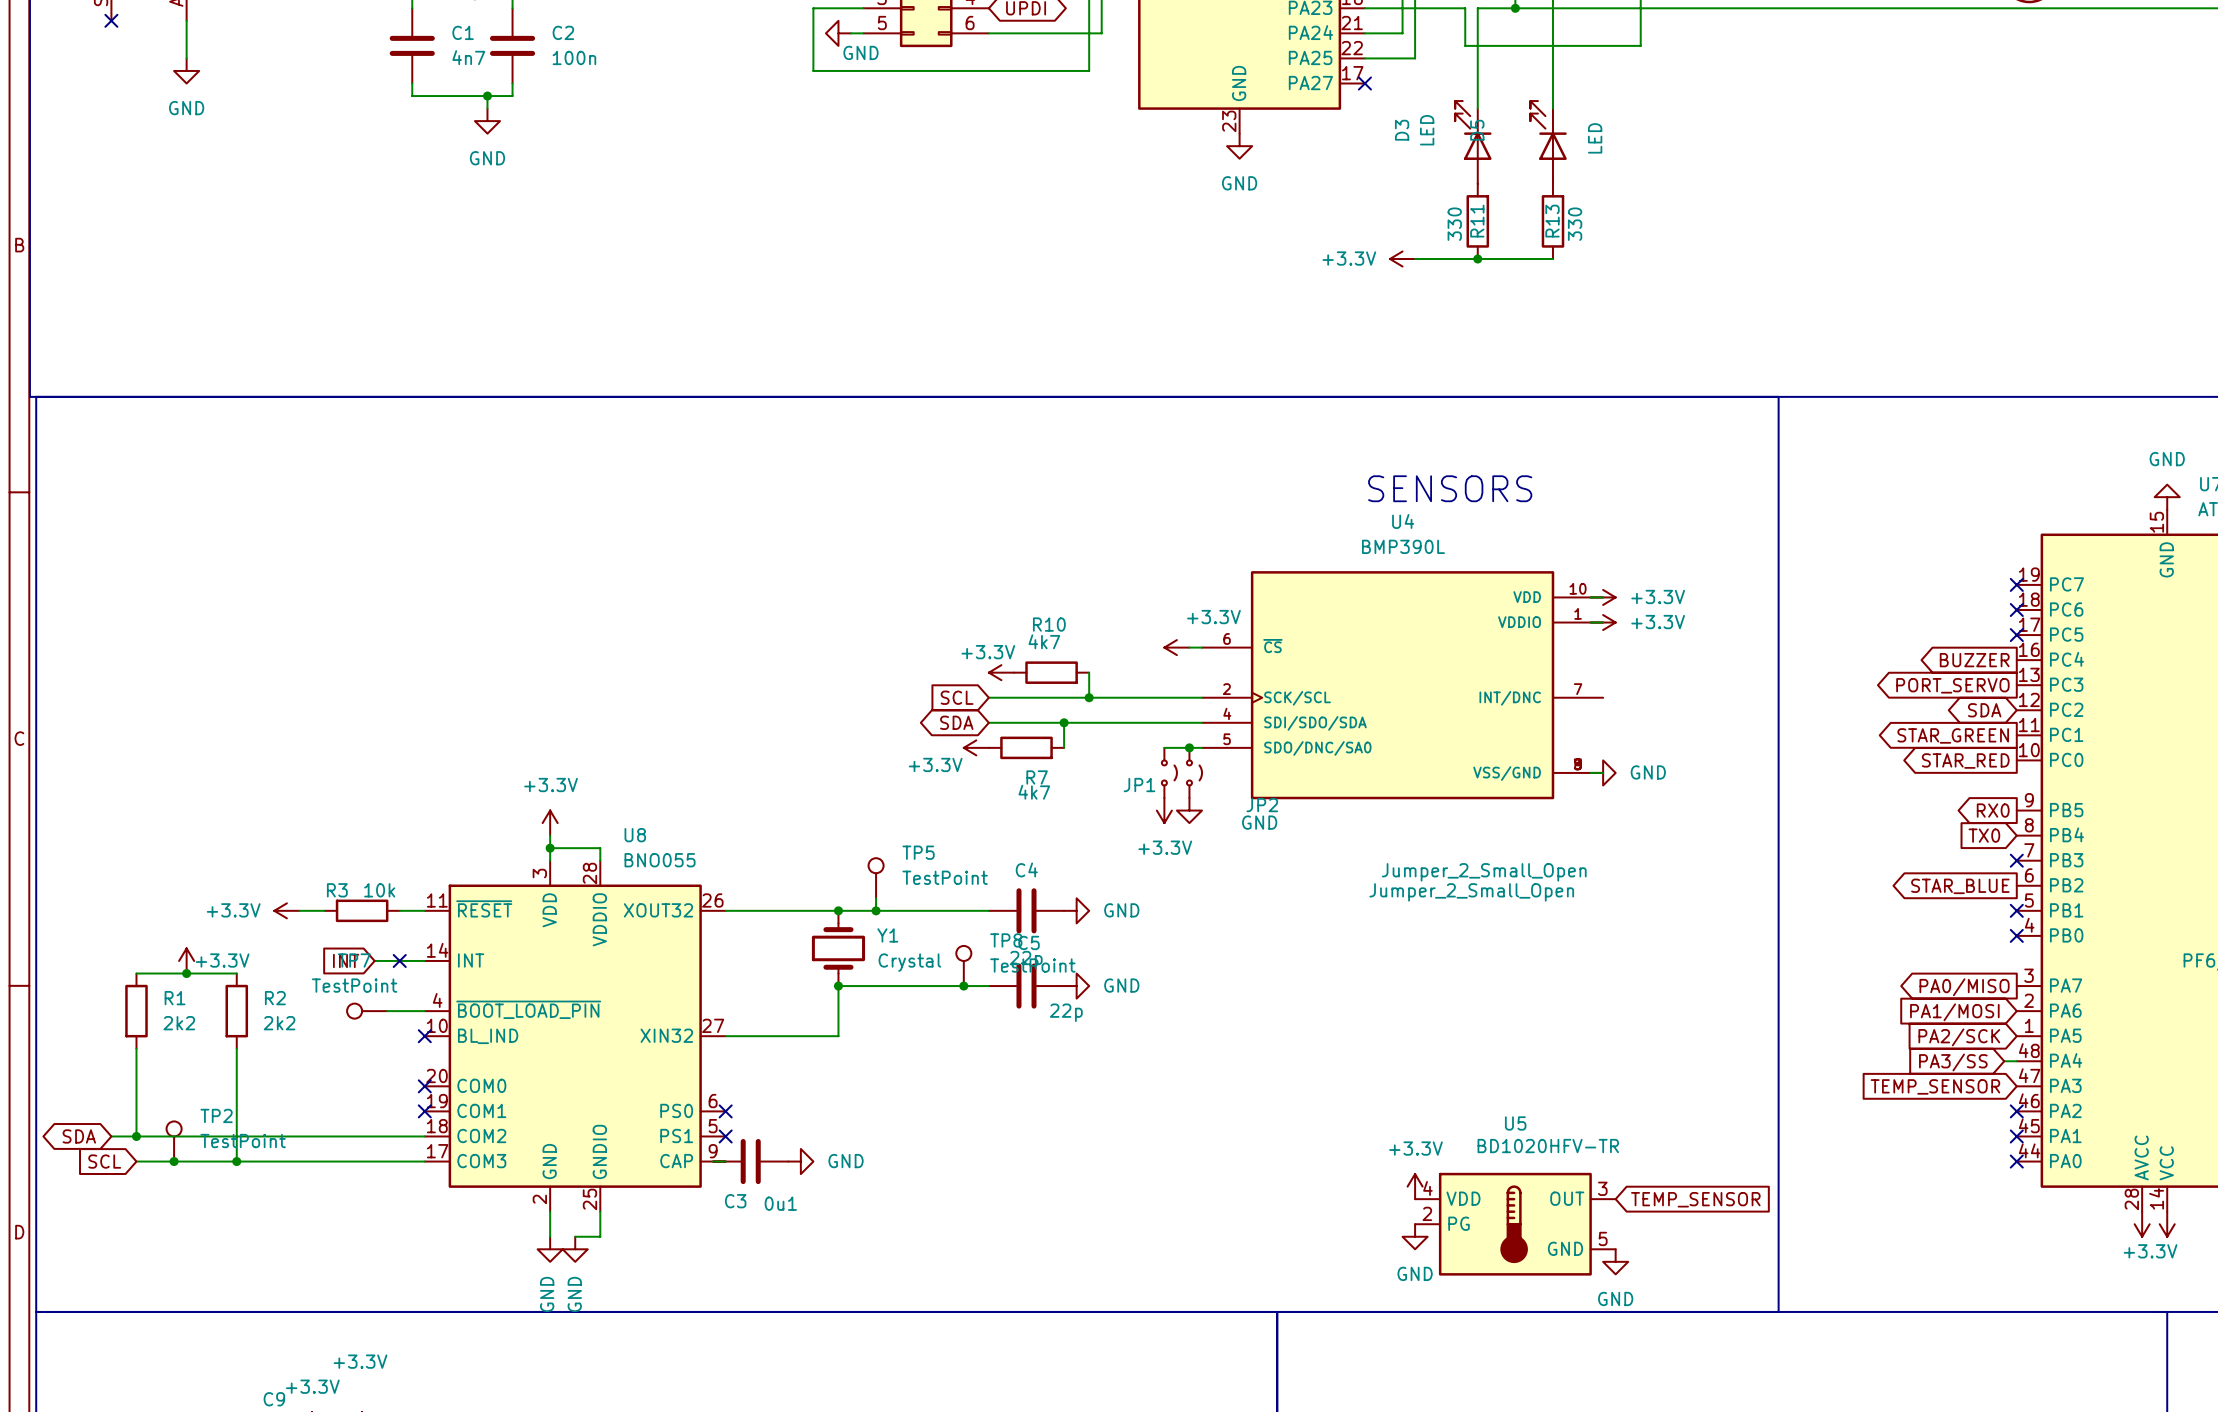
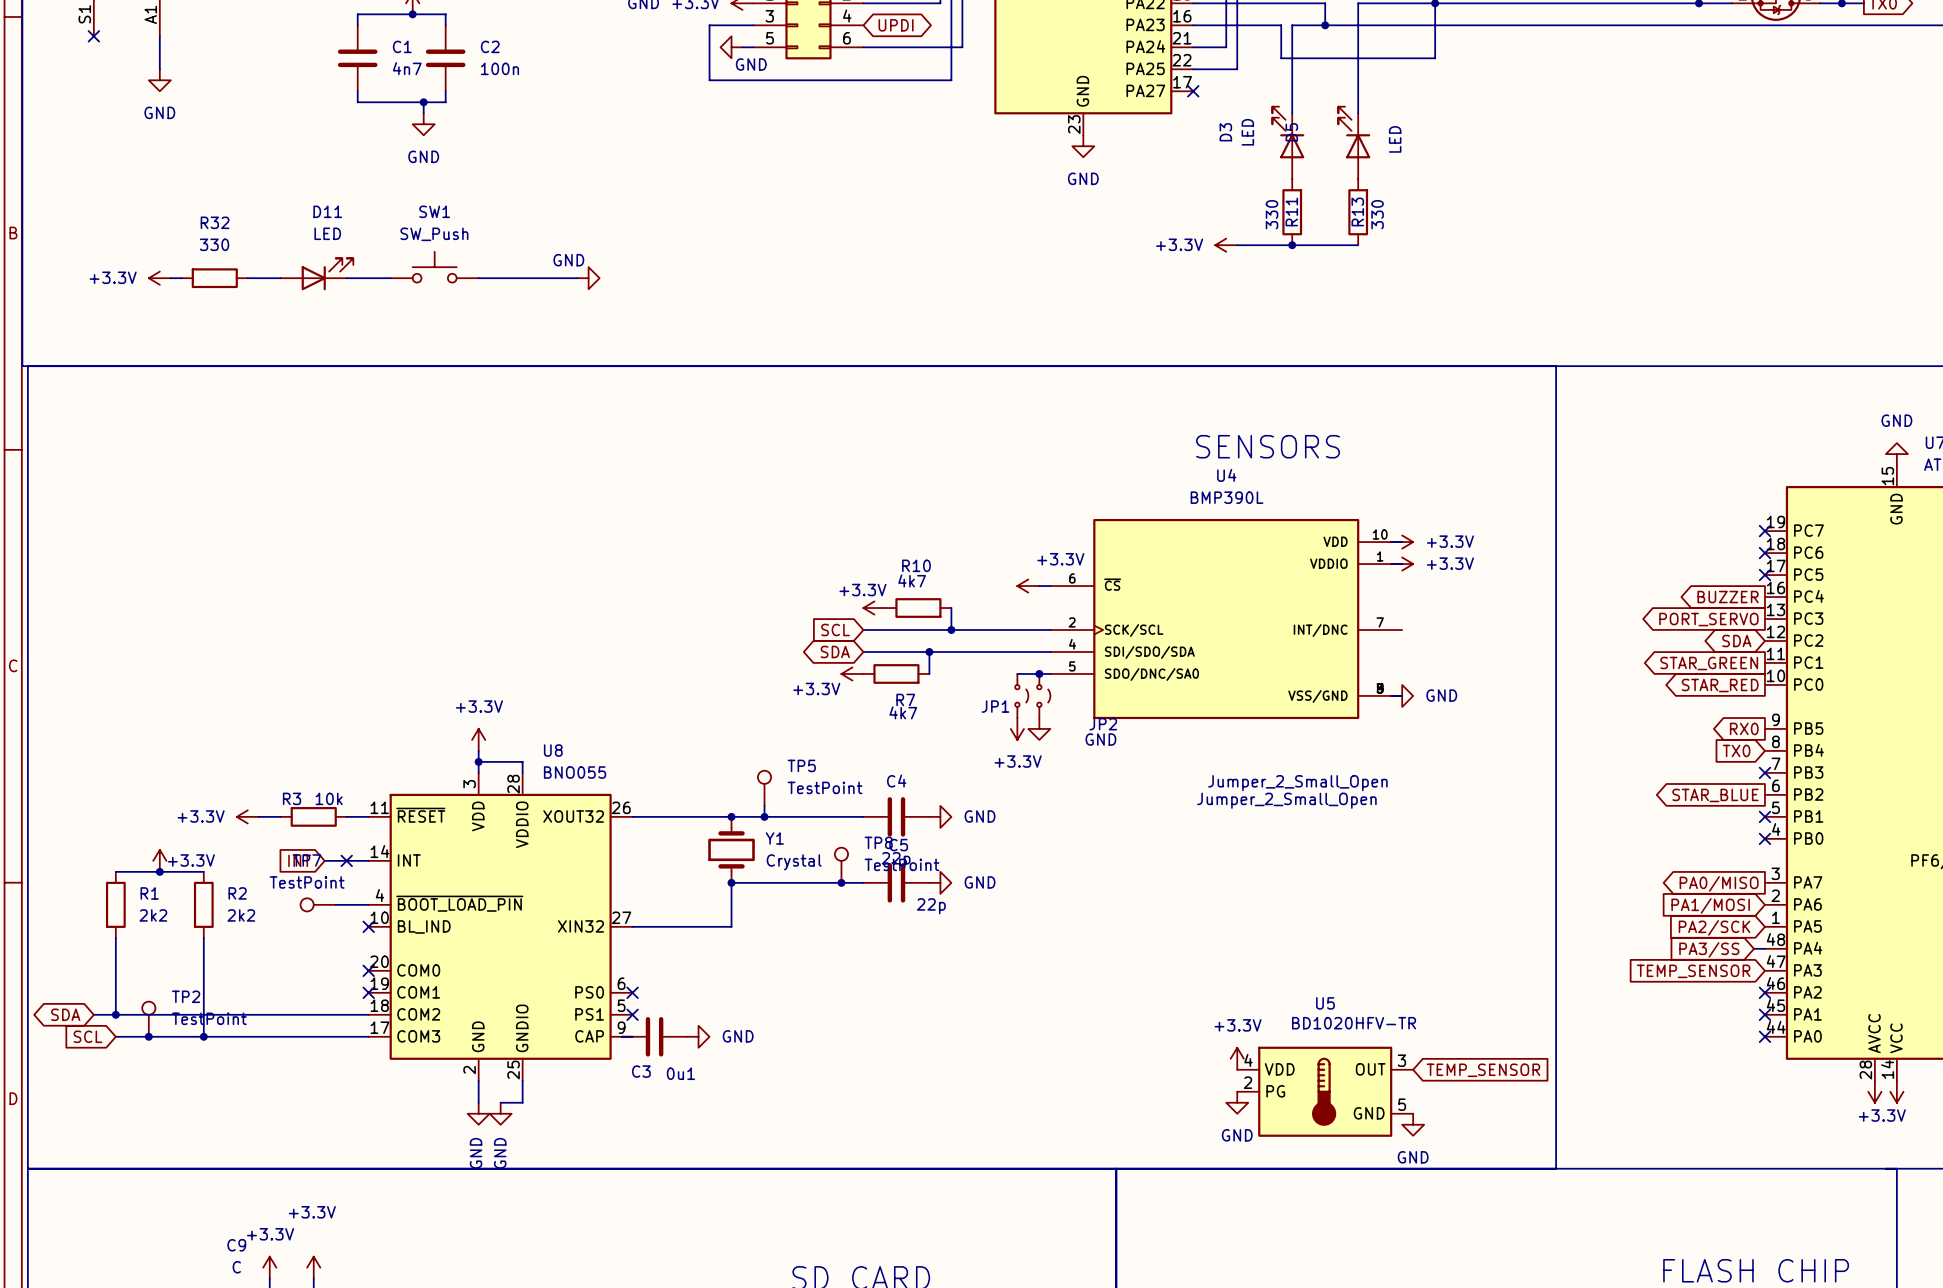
SW1: none -> SW_Push (434, 267)
D11: none -> LED (317, 274)
power symbol: none -> +3.3V (159, 278)
wire: none -> (170, 278) (181, 278)
R32: none -> 330 (214, 278)
wire: none -> (247, 278) (280, 278)
wire: none -> (346, 278) (390, 278)
wire: none -> (478, 278) (577, 278)
power symbol: none -> GND (588, 278)

